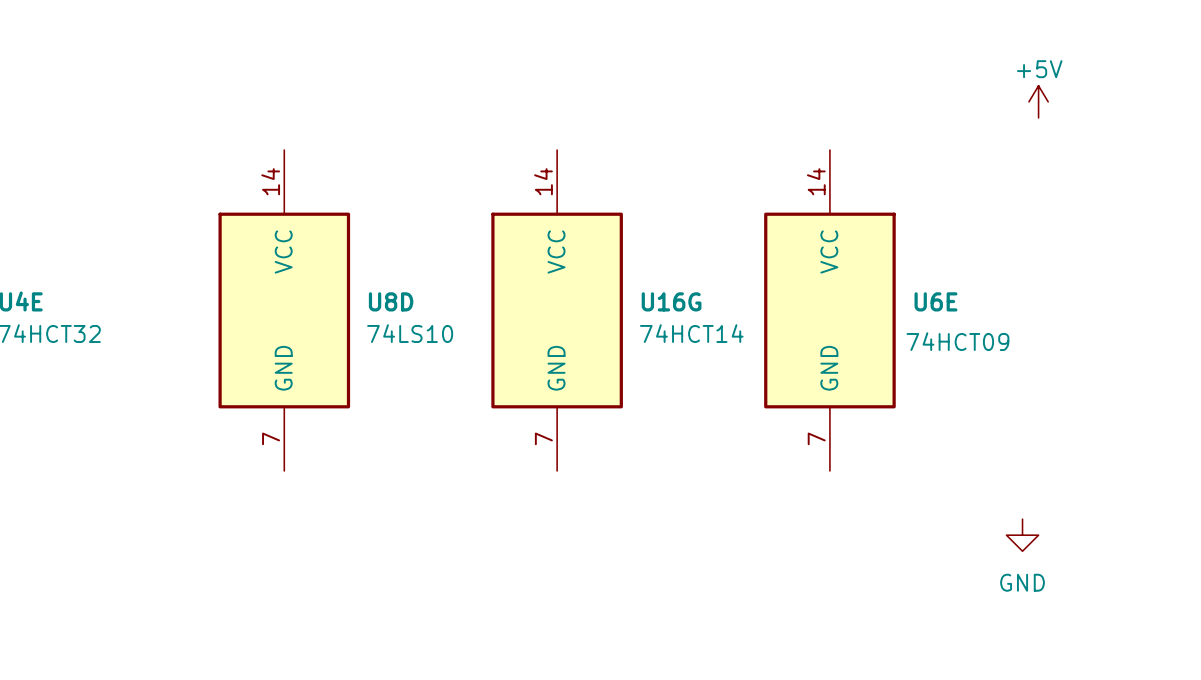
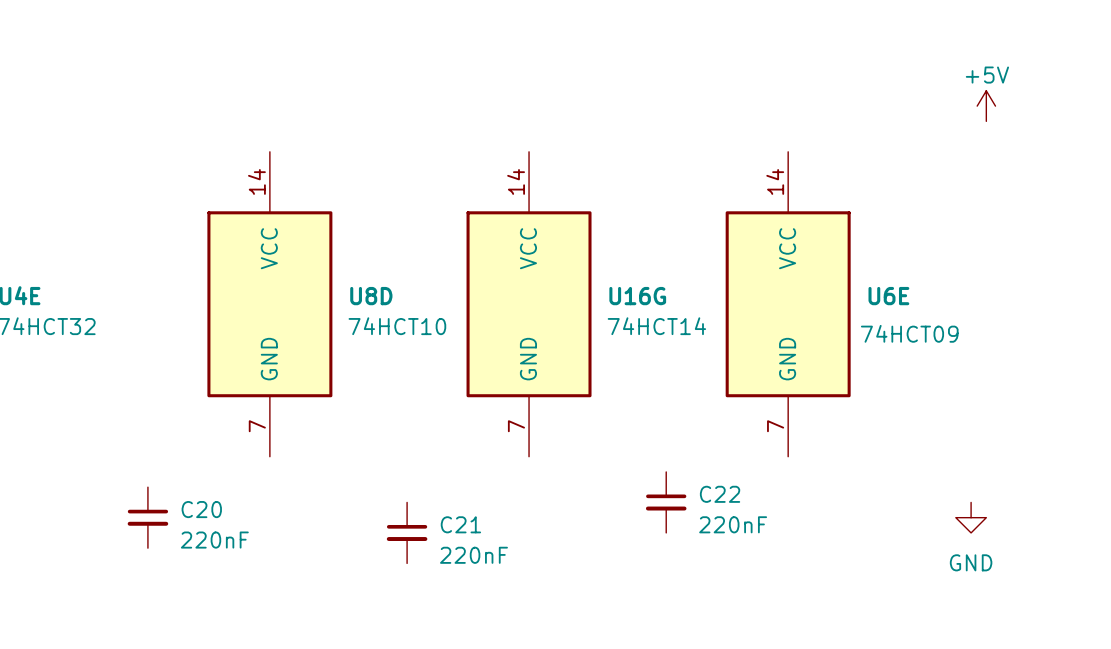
U8D value: 74LS10 (410, 333) -> 74HCT10 (397, 326)
C22: none -> 220nF (666, 502)
C20: none -> 220nF (147, 517)
C21: none -> 220nF (407, 532)

